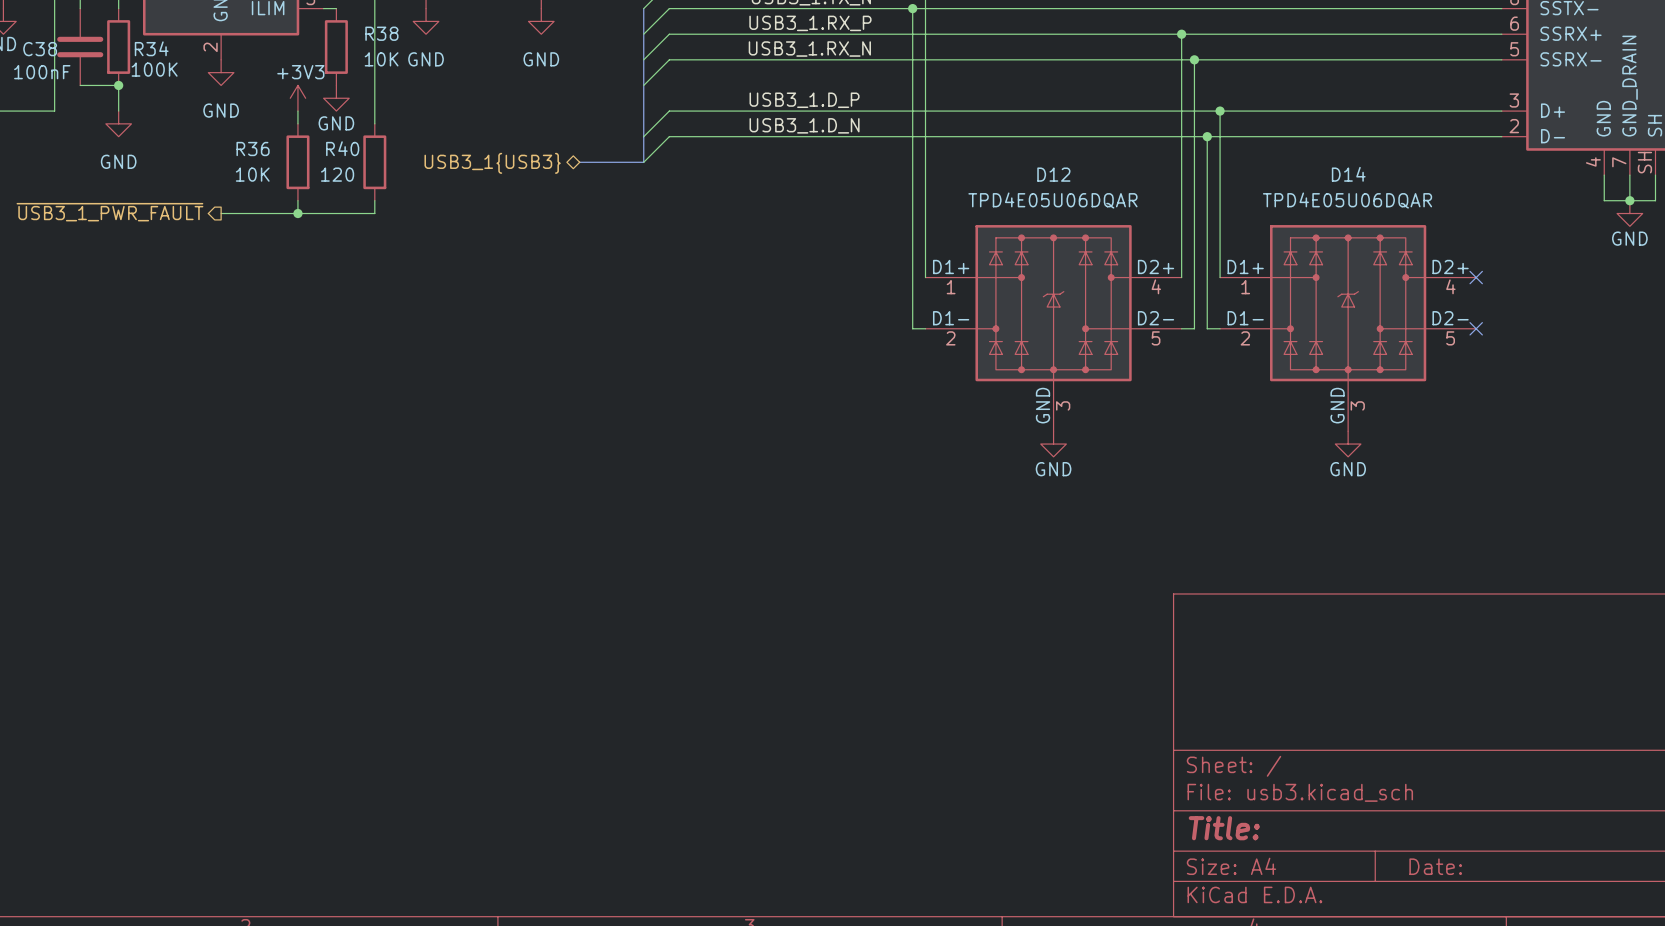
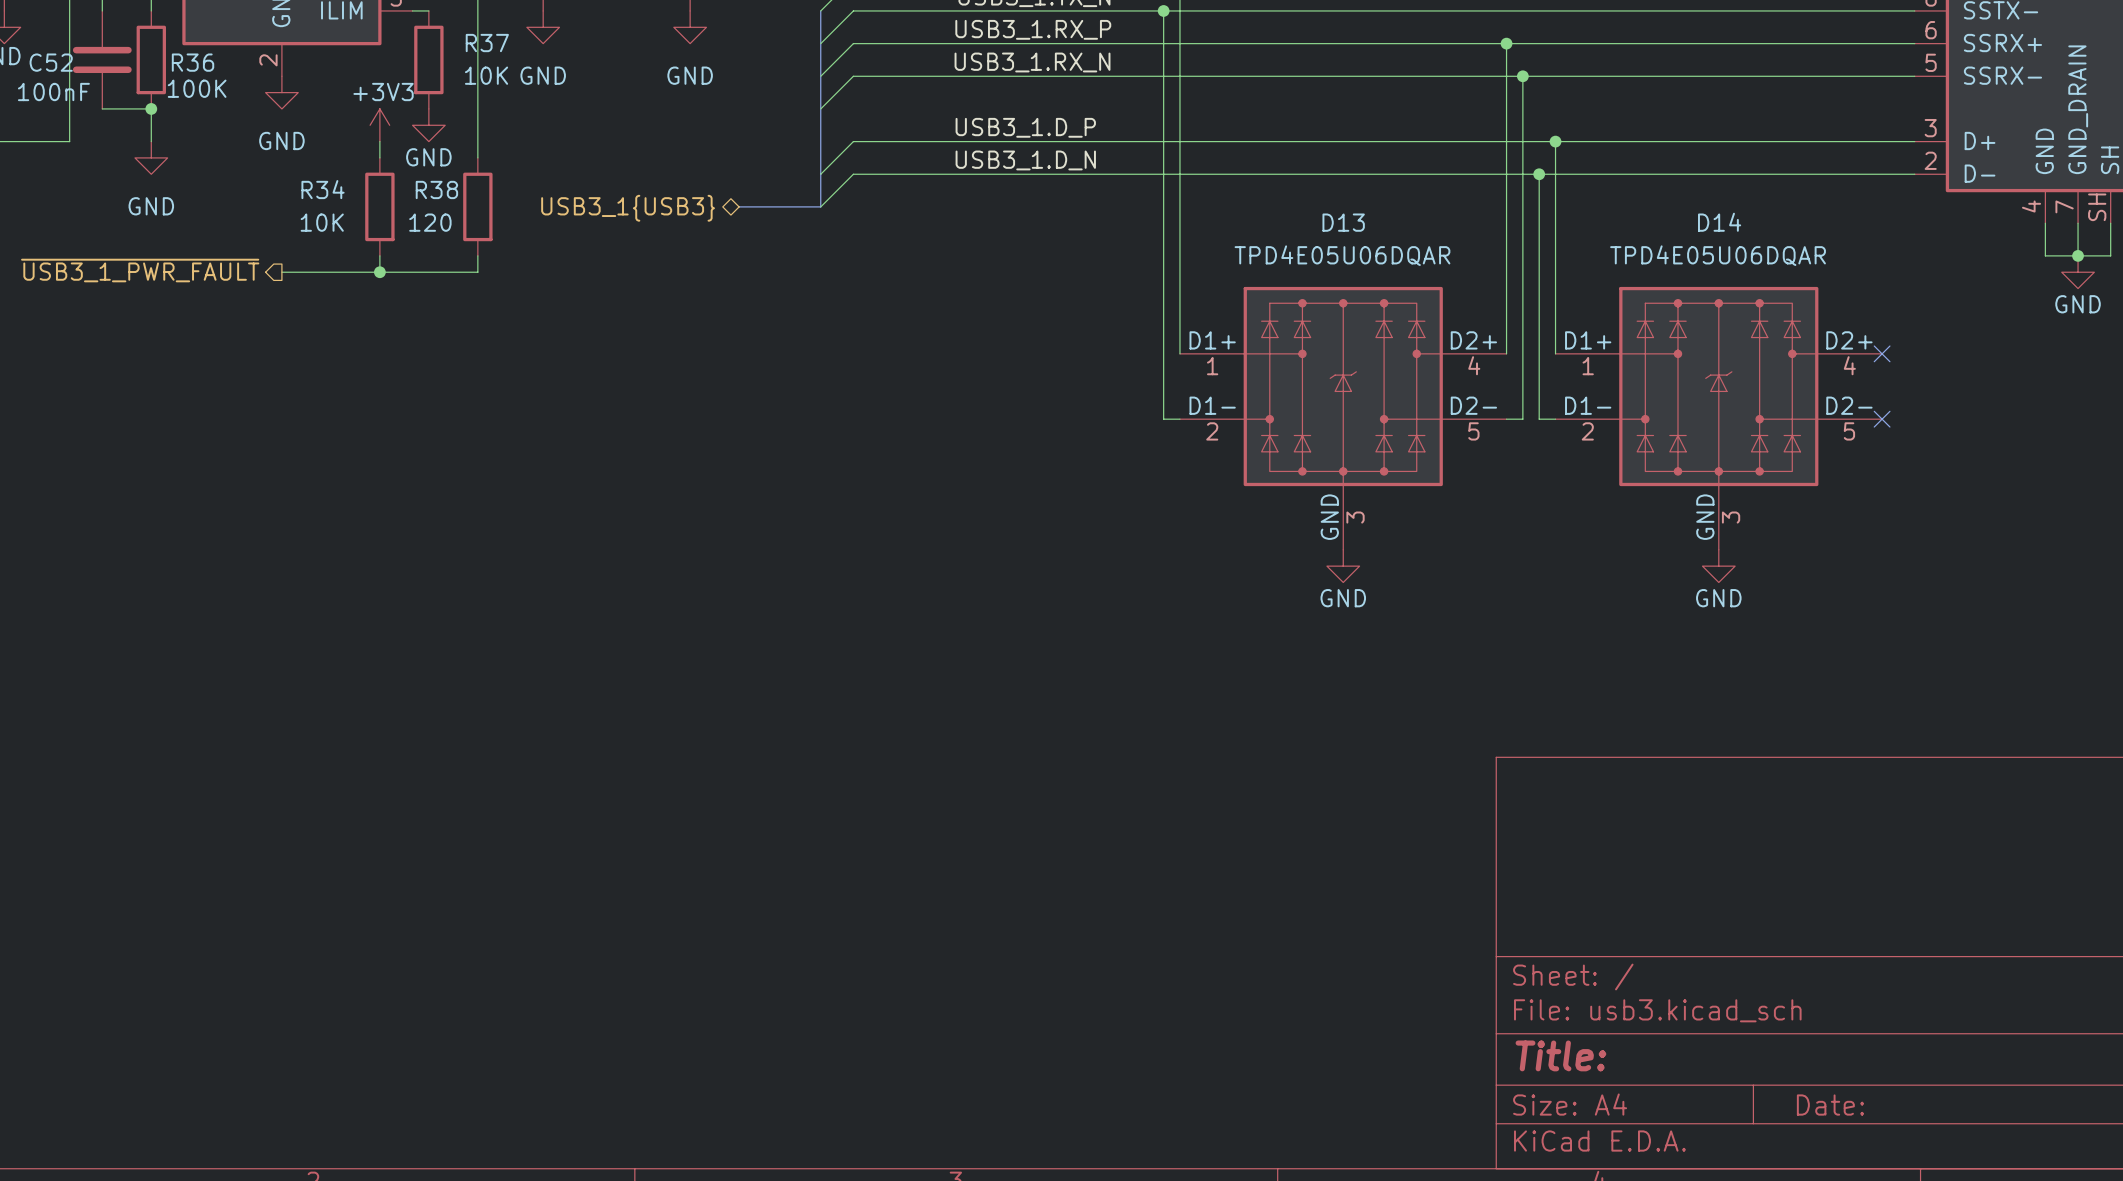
R38 name: R38 (381, 33) -> R37 (487, 43)
R34 name: R34 (151, 48) -> R36 (193, 62)
C38 name: C38 (40, 49) -> C52 (51, 62)
R40 name: R40 (342, 148) -> R38 (436, 189)
R36 name: R36 (253, 149) -> R34 (323, 189)
D12 name: D12 (1053, 174) -> D13 (1343, 222)

